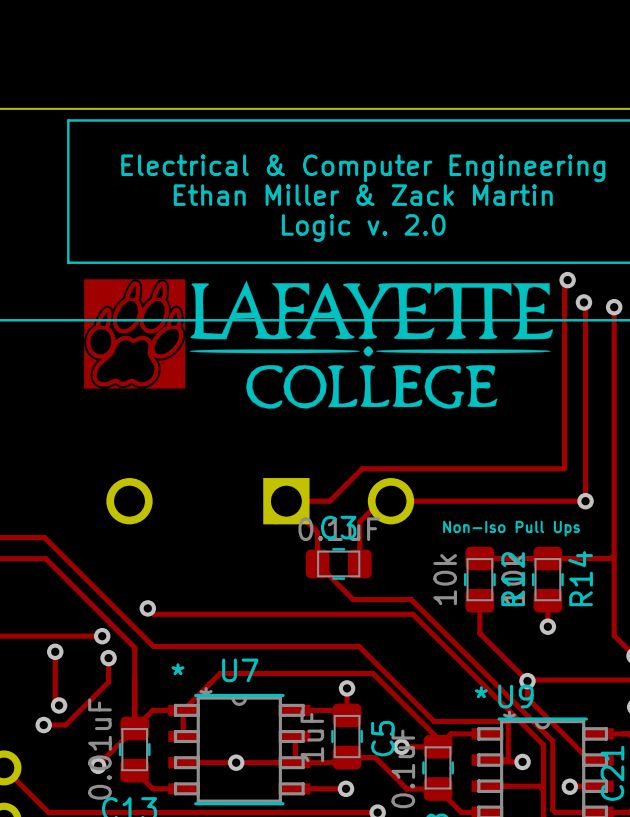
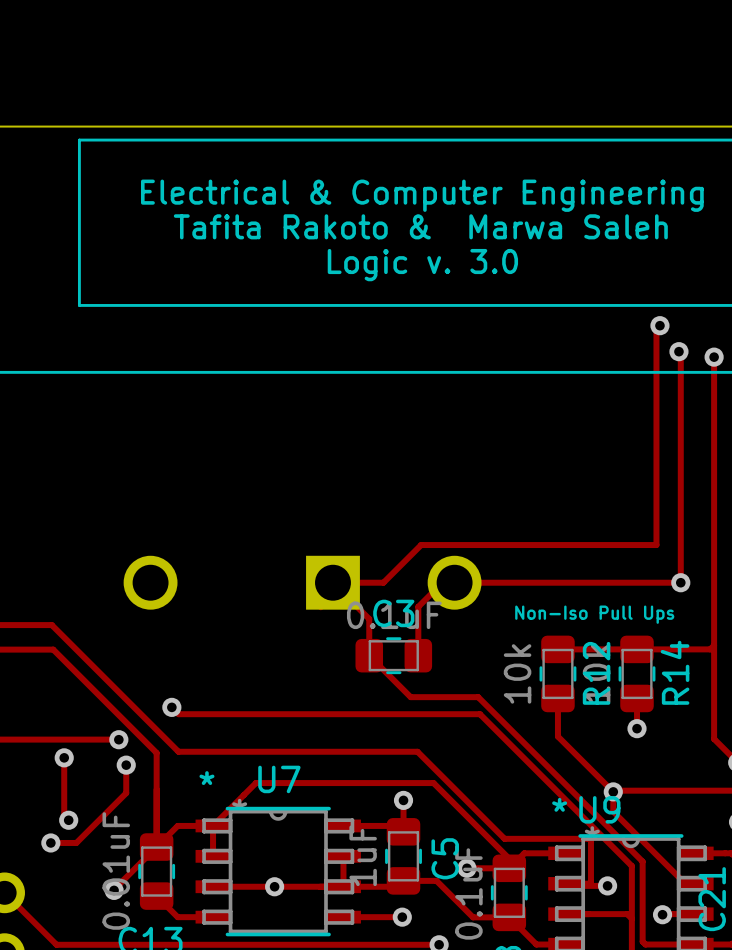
text: Ethan Miller & Zack Martin (363, 195) -> Tafita Rakoto & Marwa Saleh (420, 226)
text: Logic v. 2.0 (363, 228) -> Logic v. 3.0 (422, 265)
drawing: [84, 279, 554, 409] -> none

